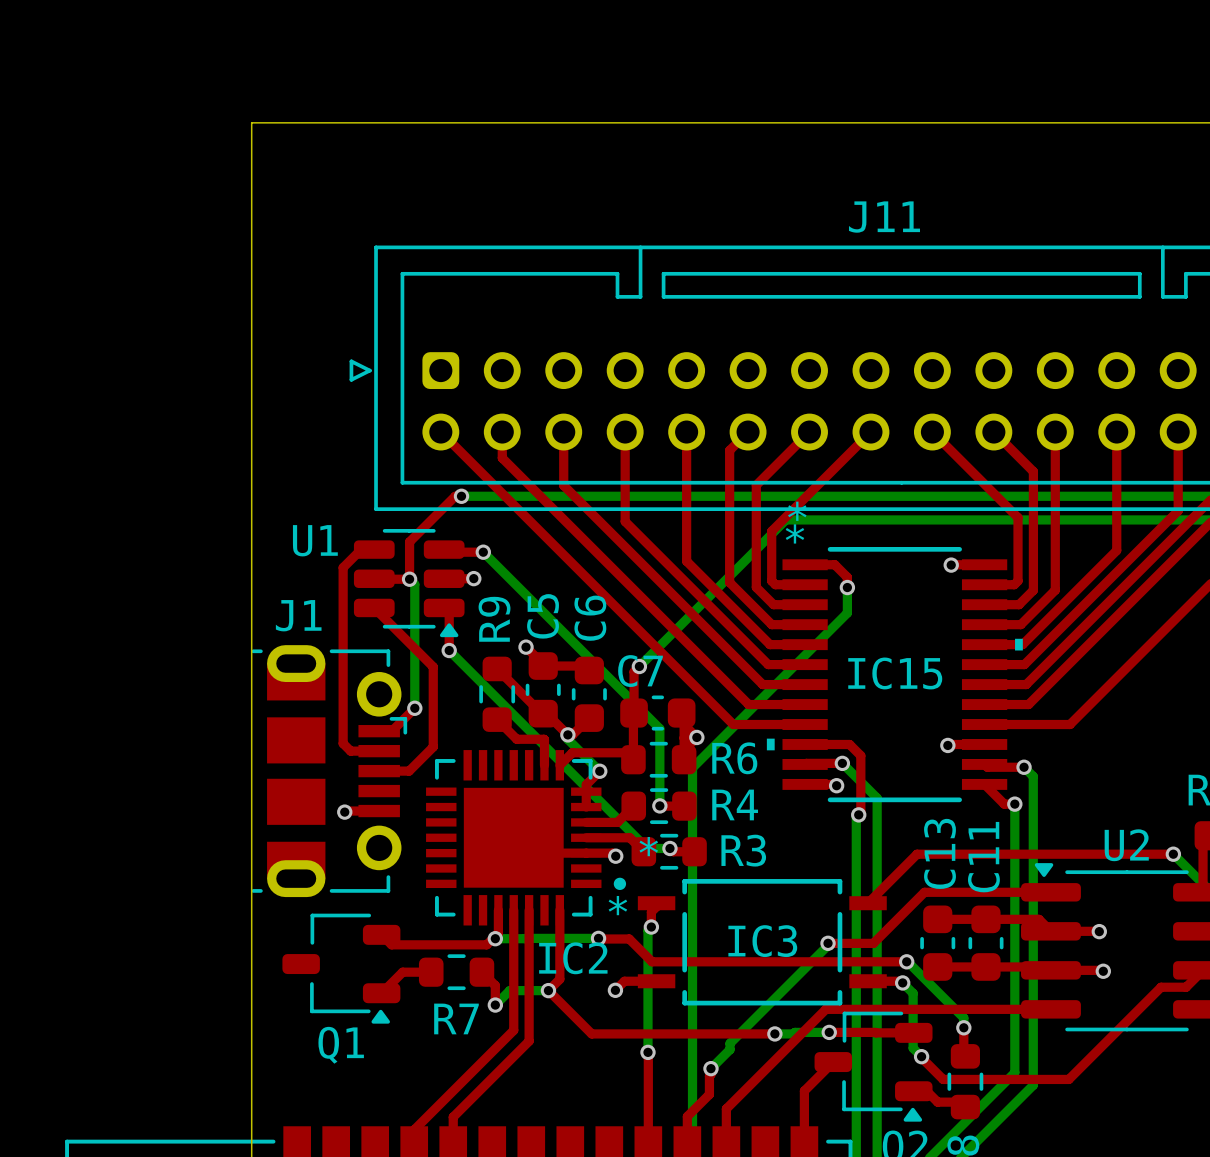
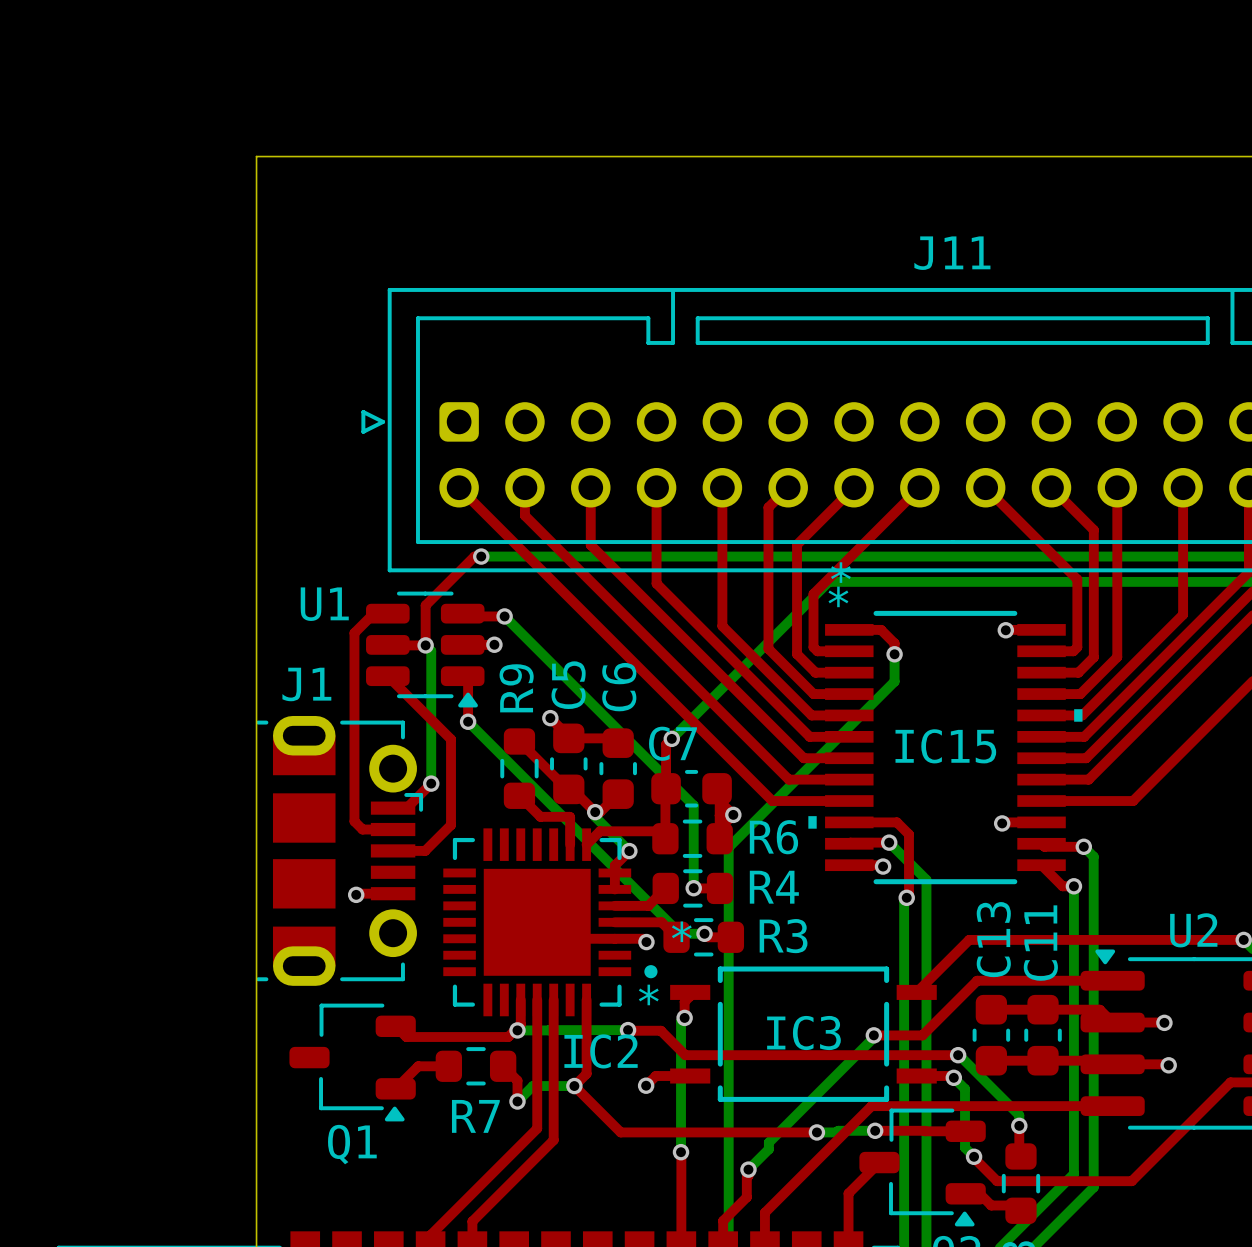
J11 name position: J11 (884, 217) -> J11 (952, 253)

